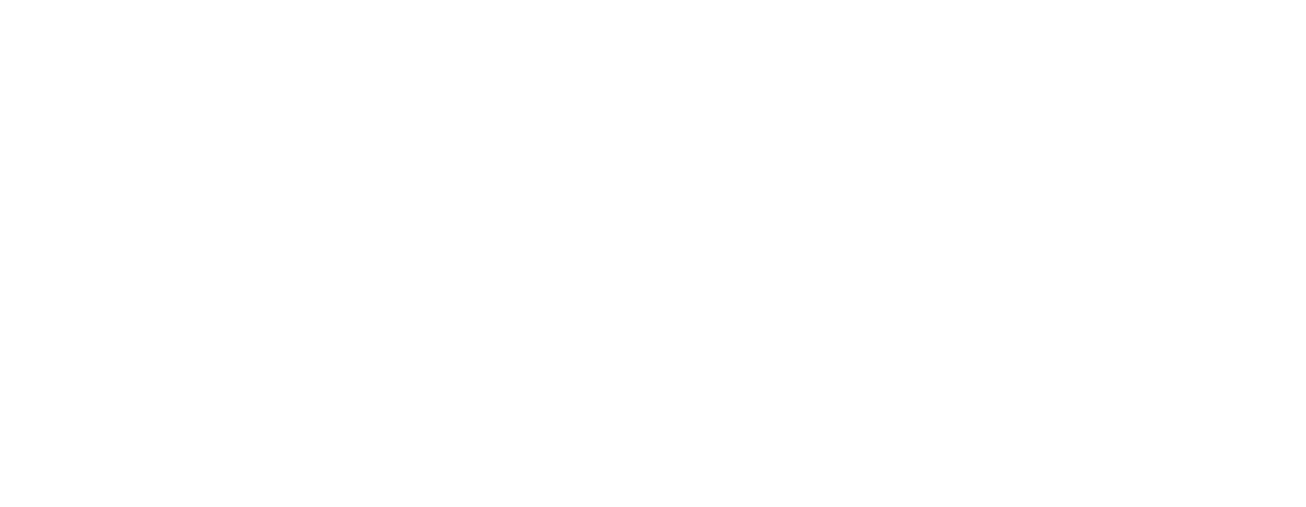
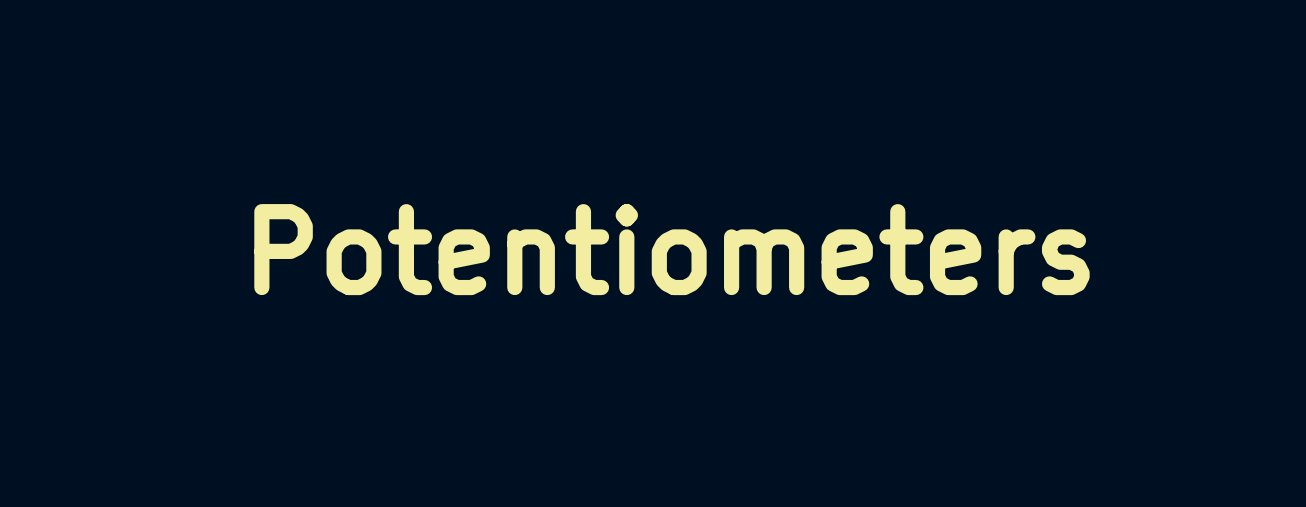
text: none -> Potentiometers (671, 249)

